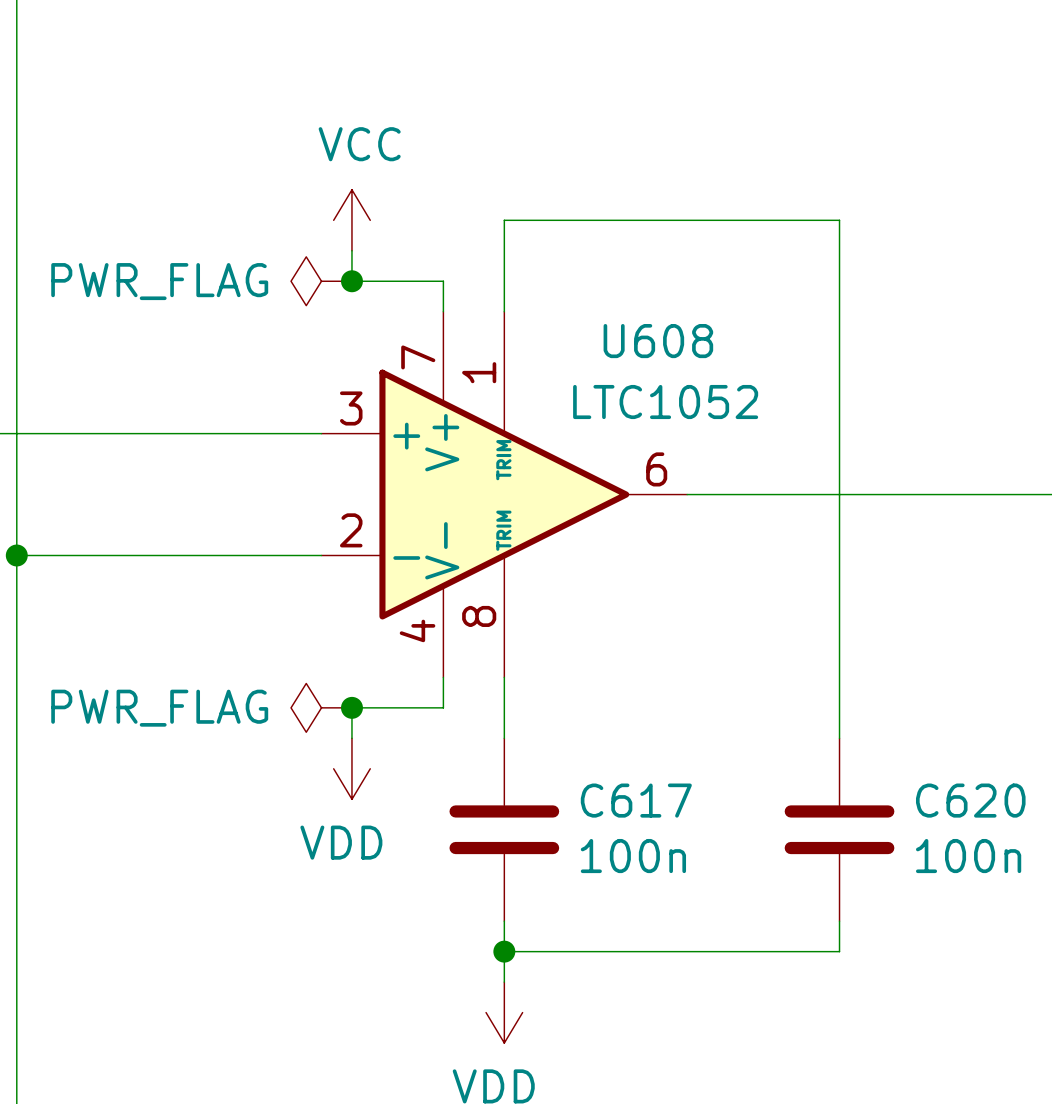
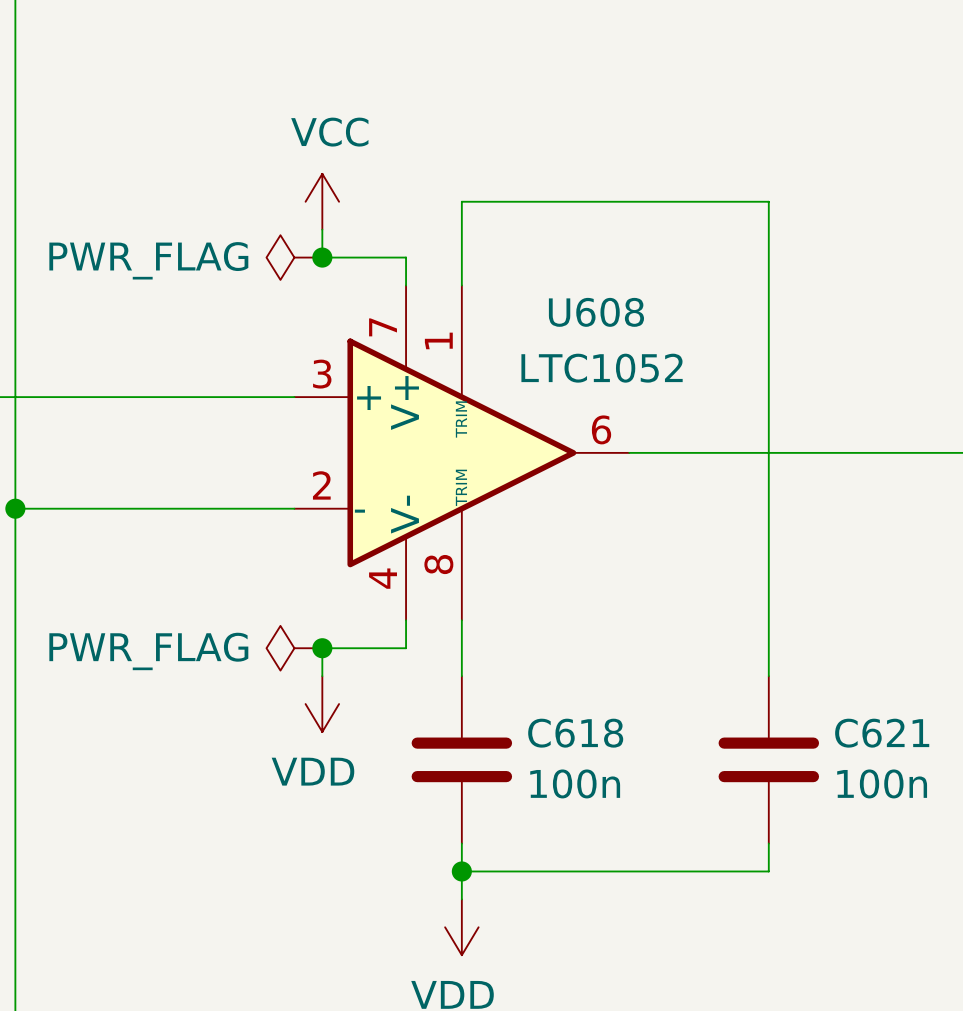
C617 name: C617 (636, 800) -> C618 (575, 733)
C620 name: C620 (970, 800) -> C621 (882, 733)

